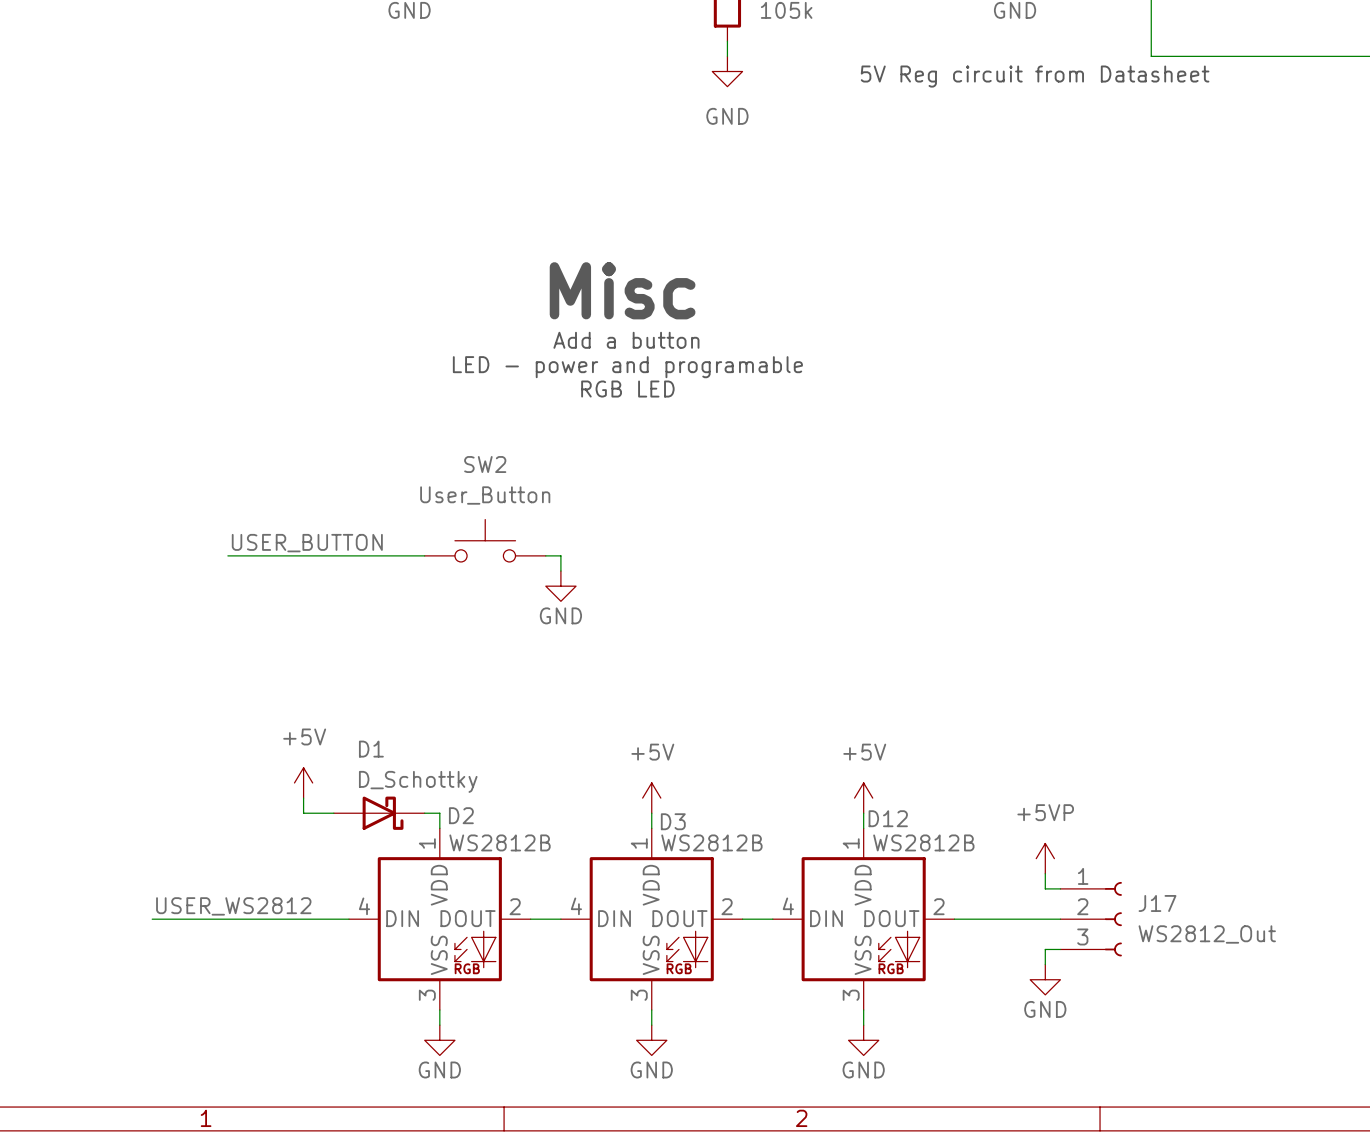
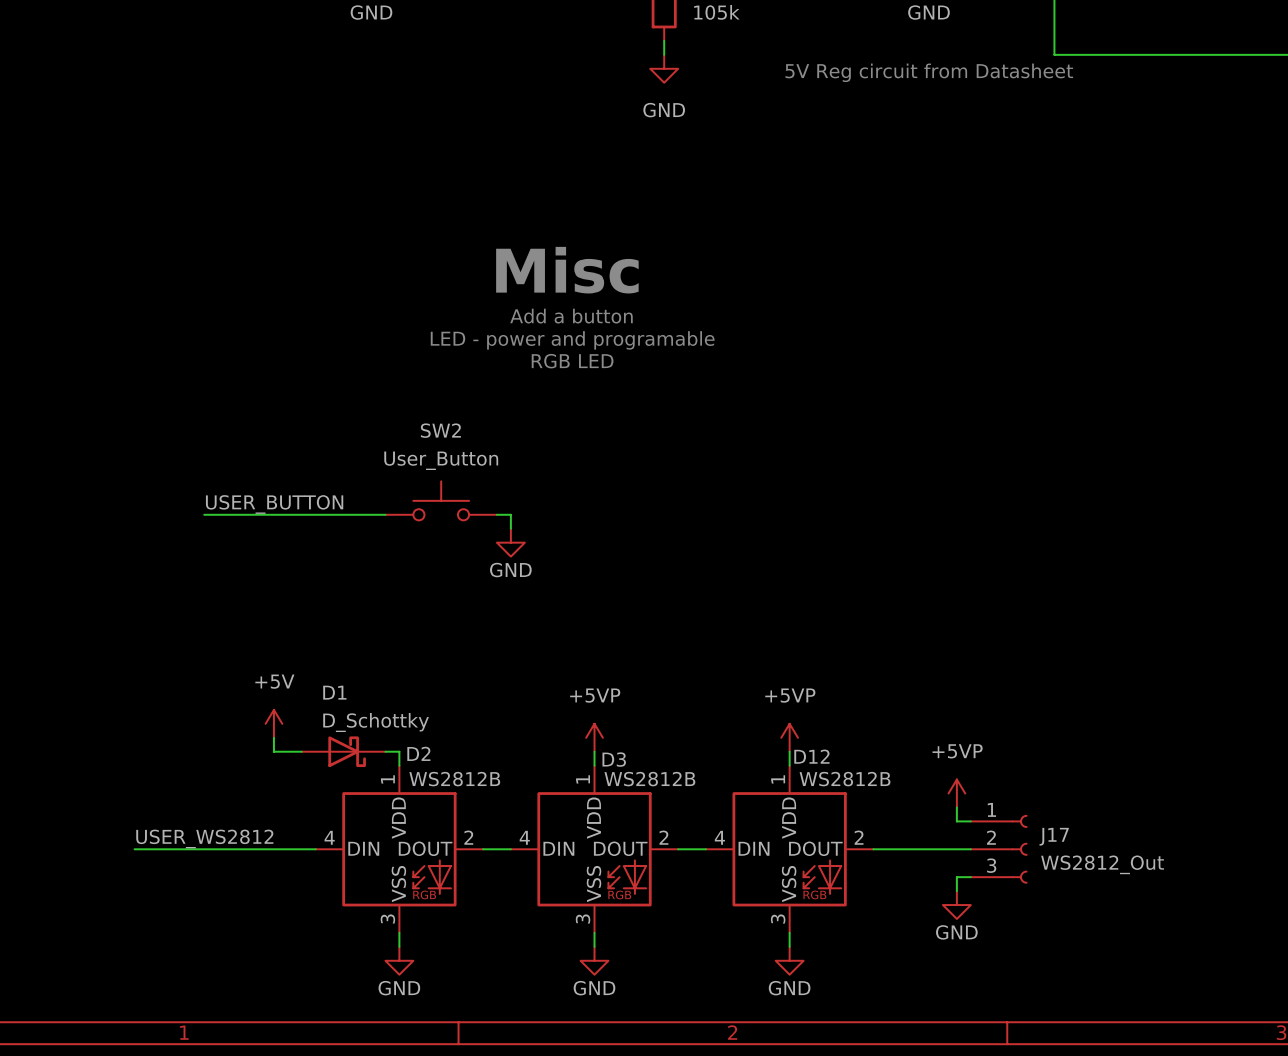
power symbol: +5V (651, 798) -> +5VP (594, 737)
power symbol: +5V (863, 798) -> +5VP (789, 737)

